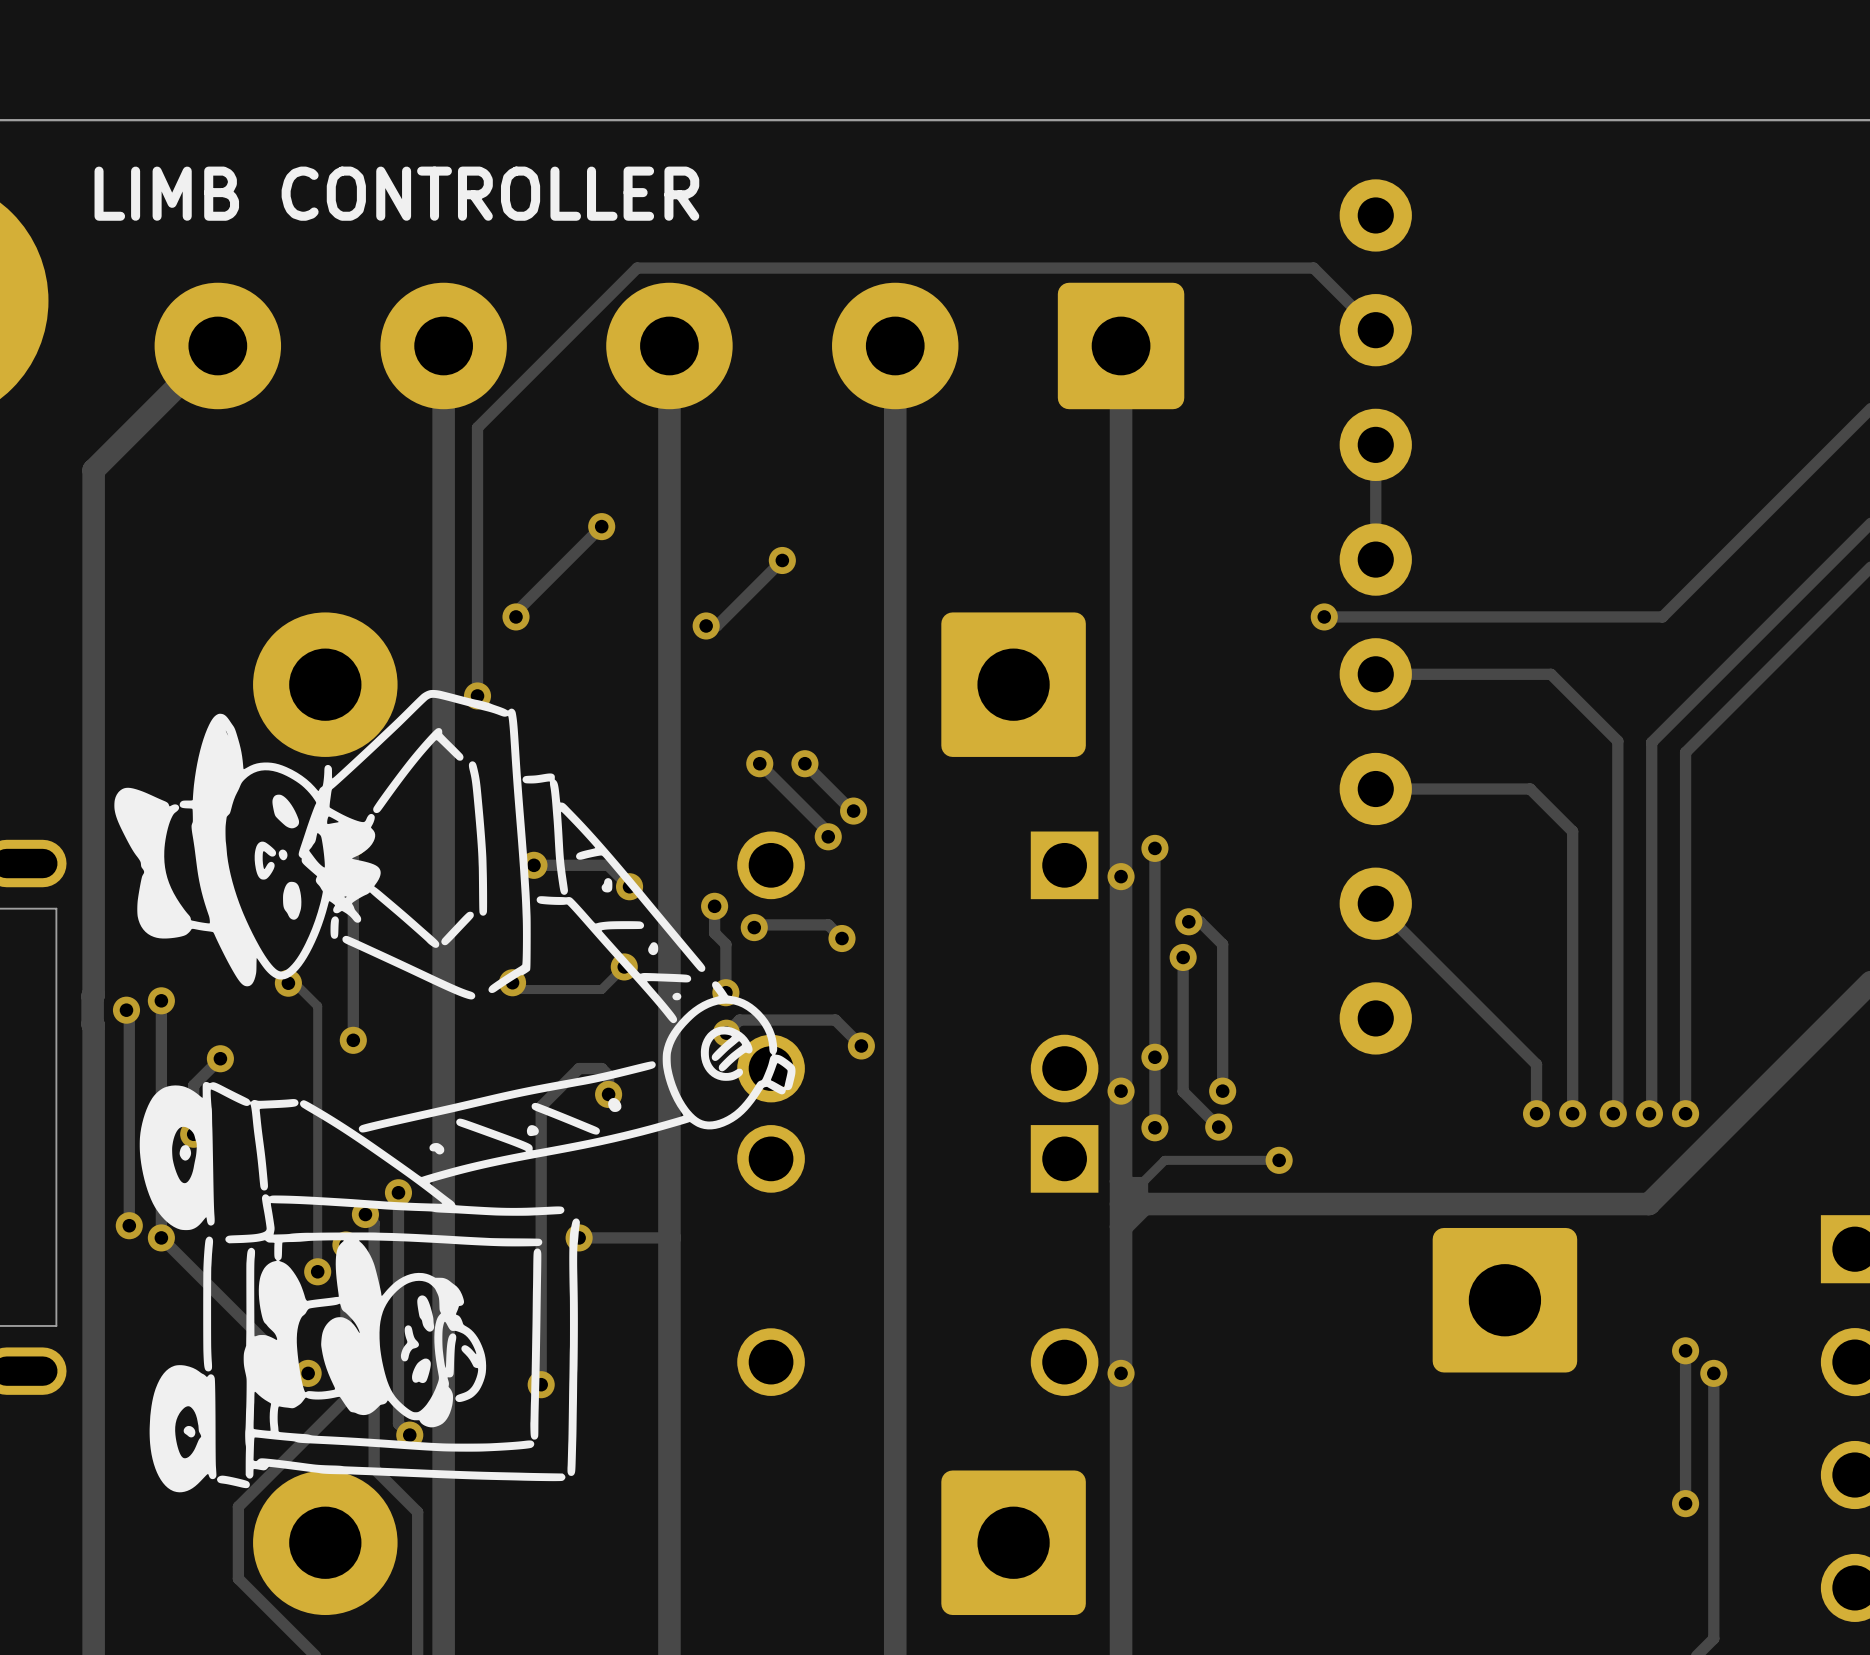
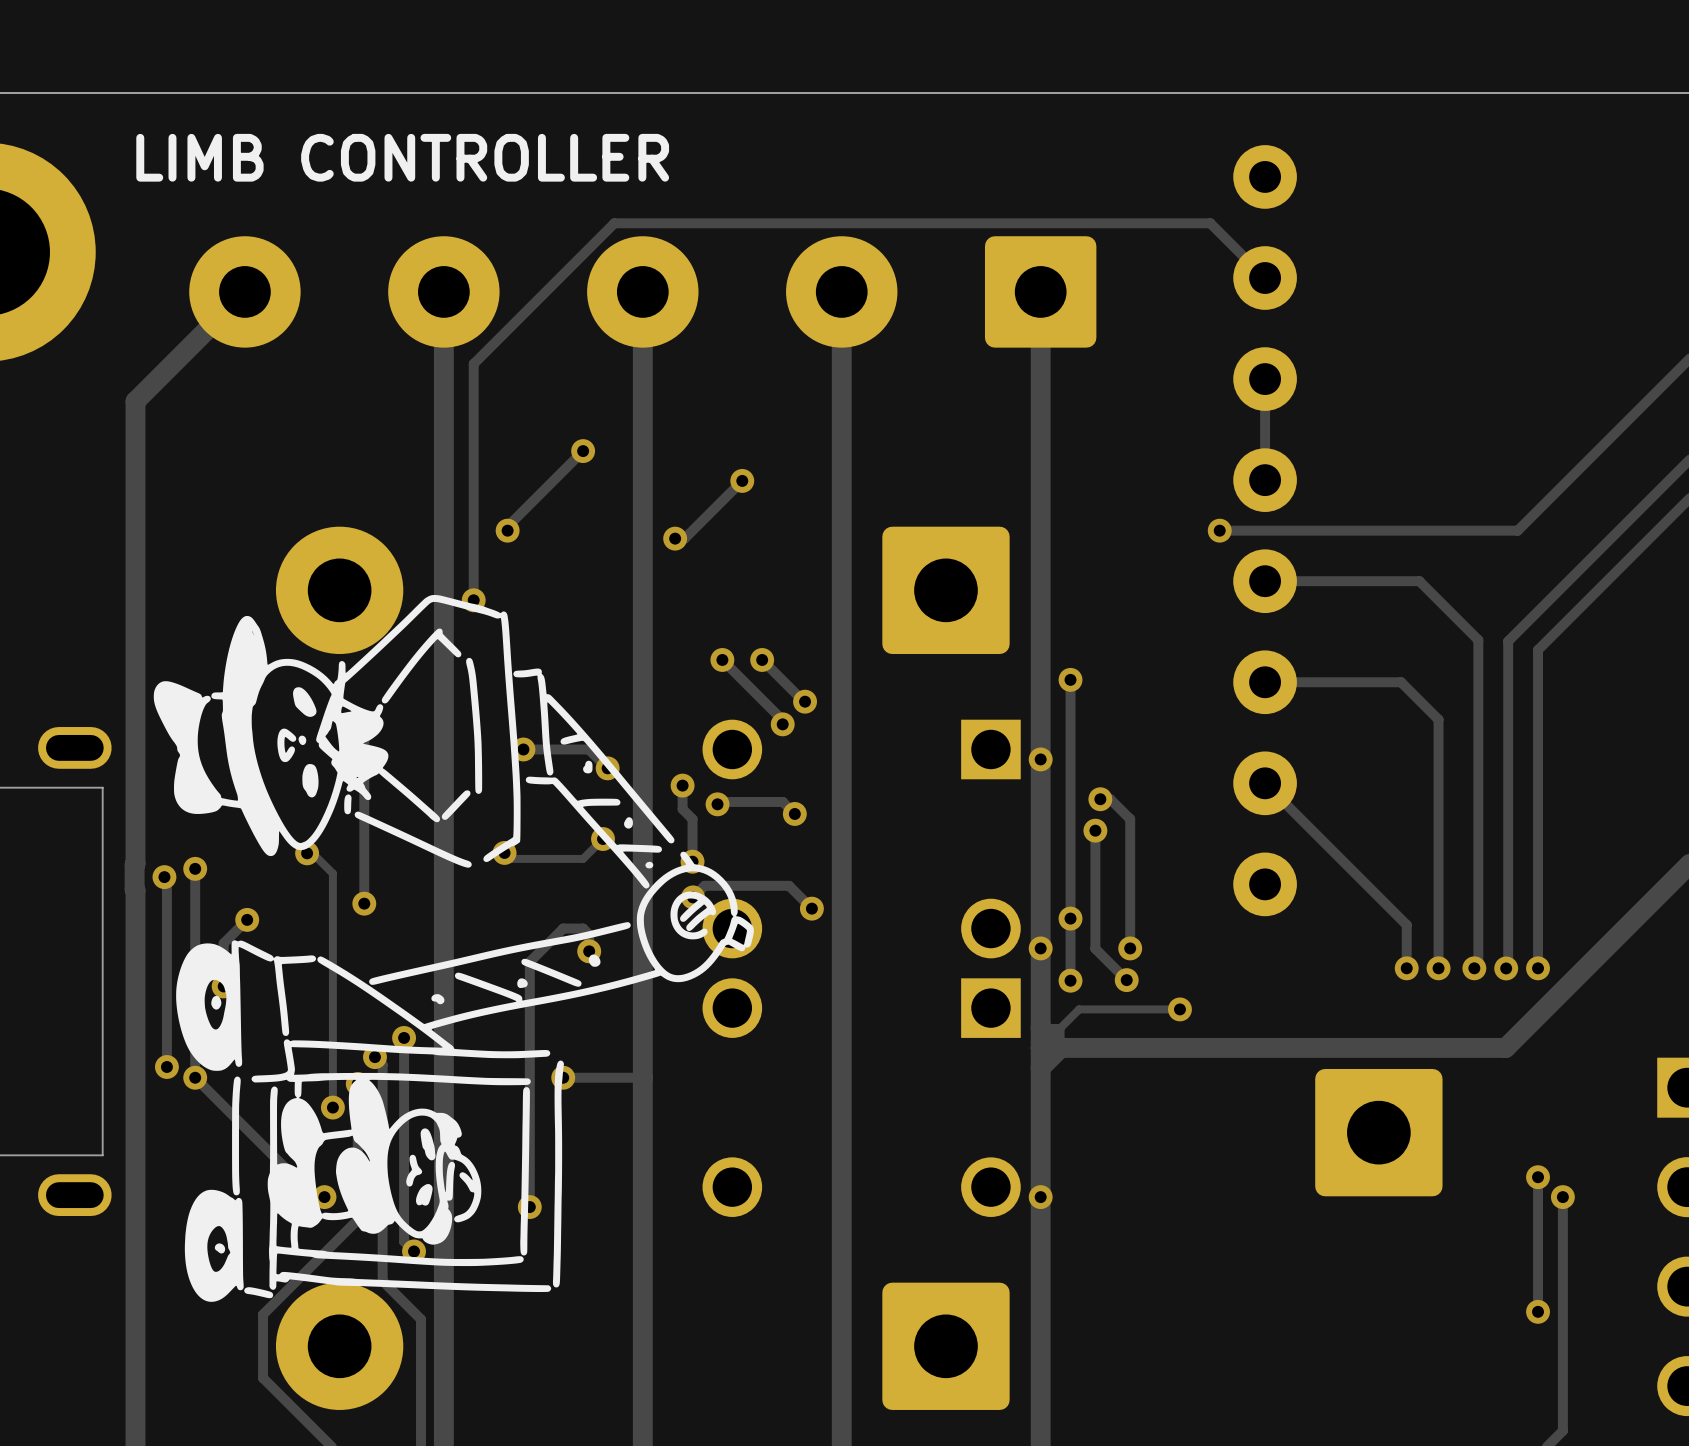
track: none -> (1070, 679) (1070, 734)
via position: (1154, 848) -> (1070, 679)

